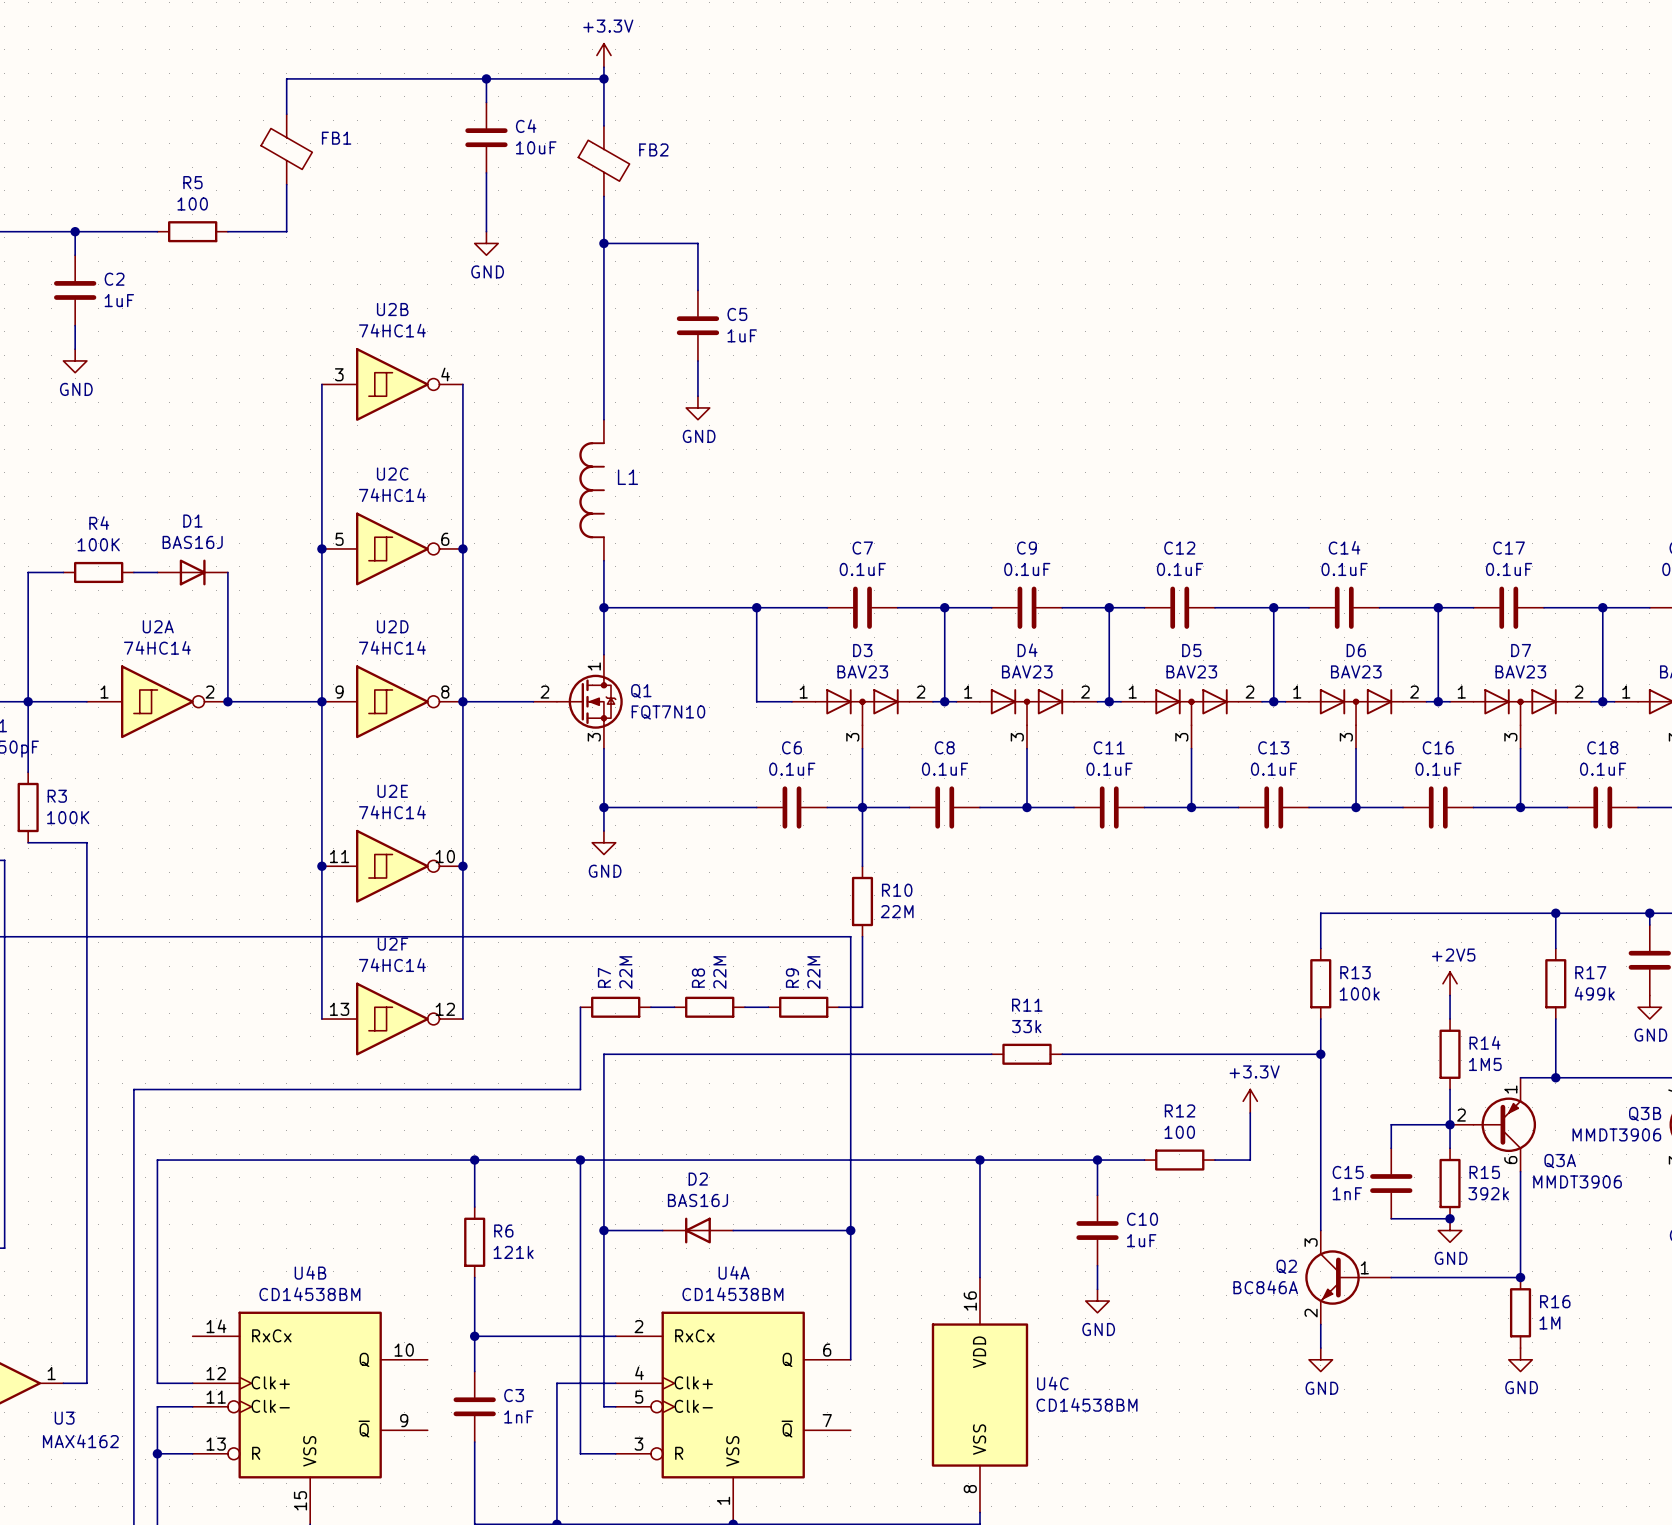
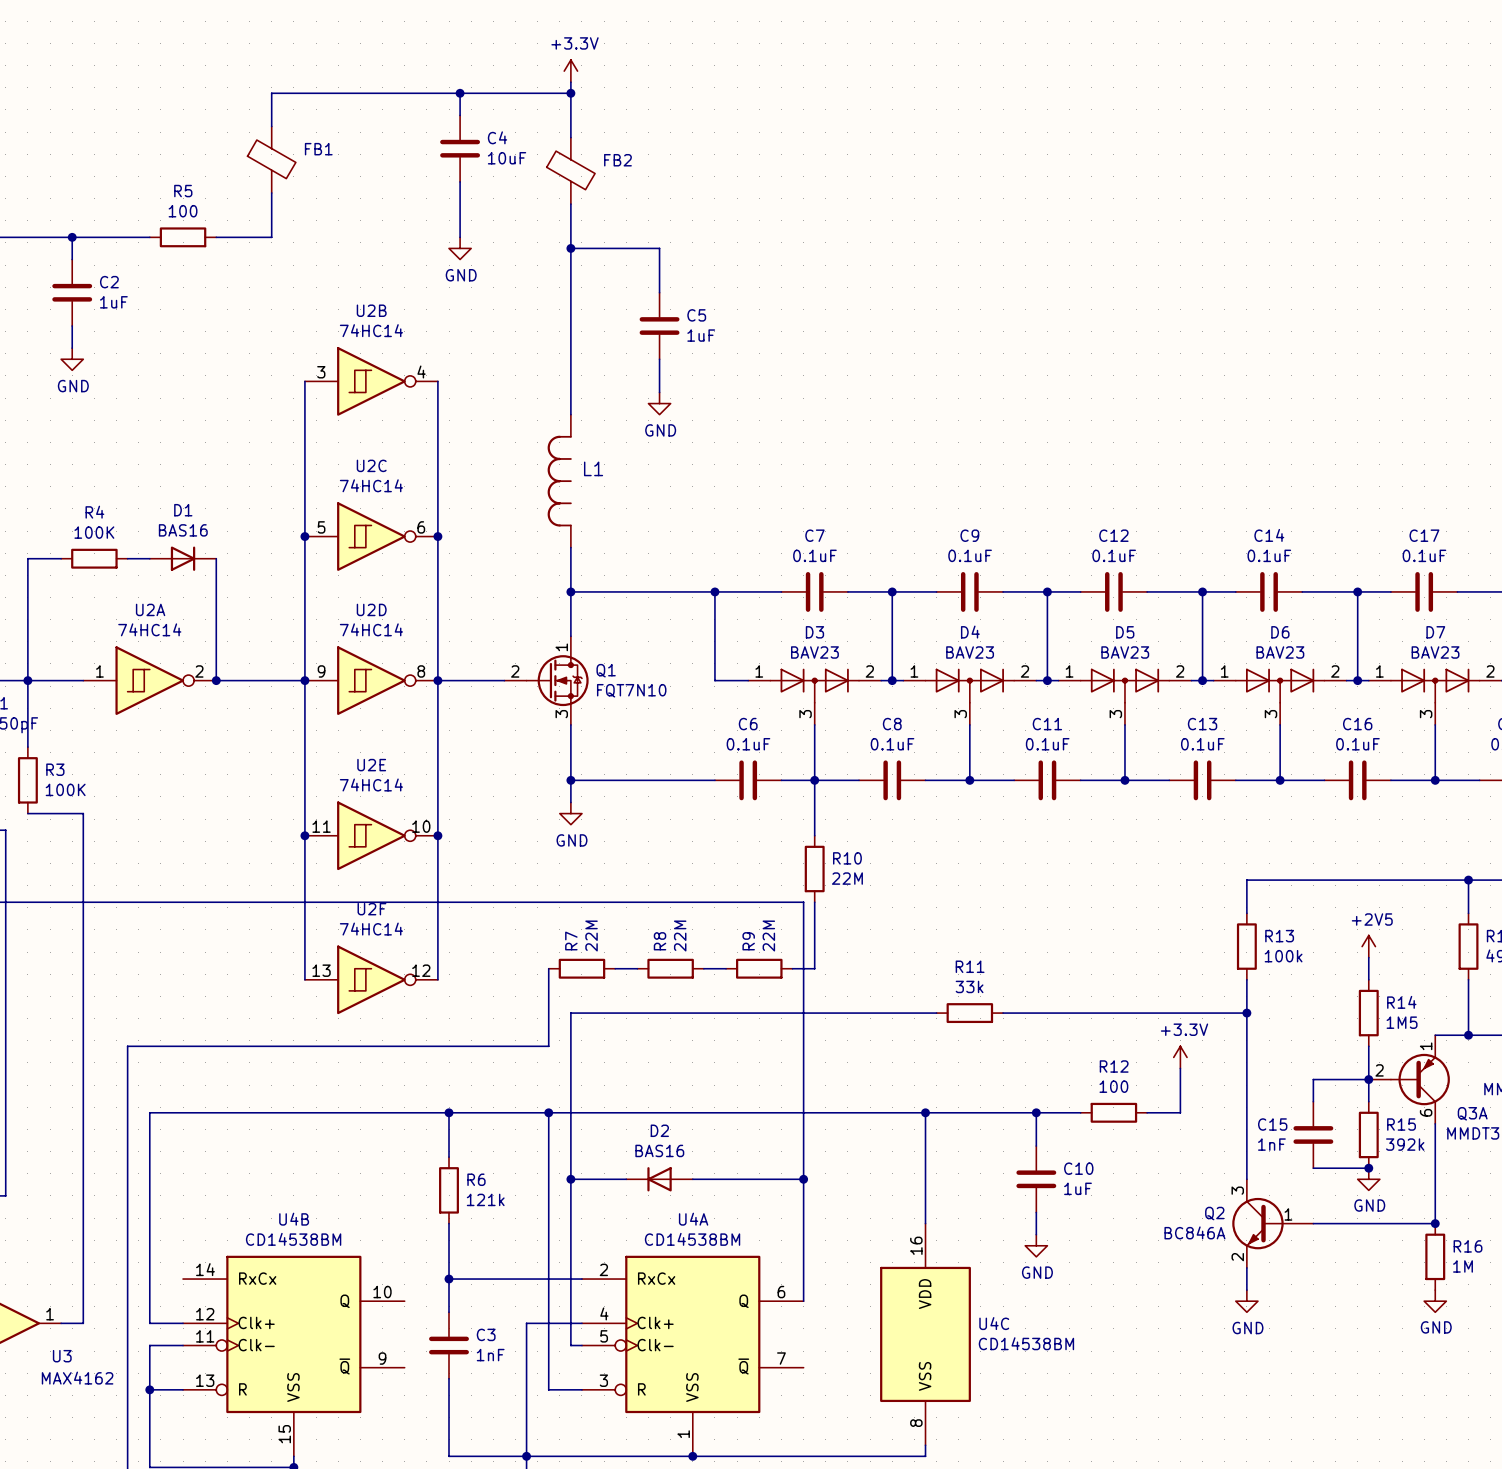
D1 value: BAS16J (192, 542) -> BAS16 (183, 530)
D2 value: BAS16J (697, 1200) -> BAS16 (659, 1150)

